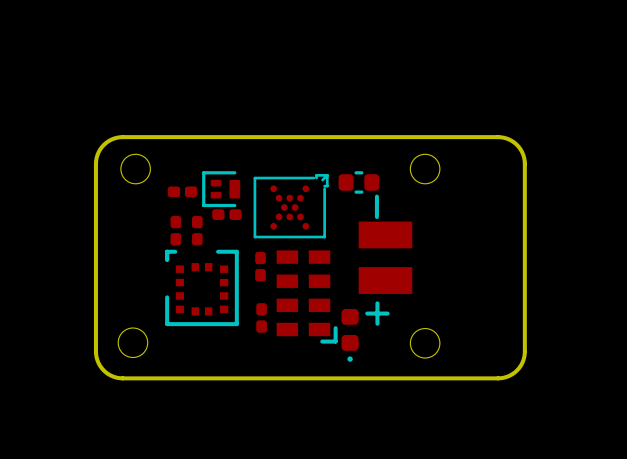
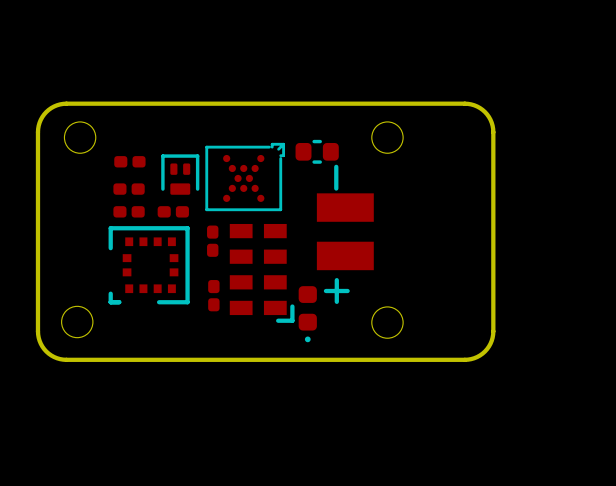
part rotation: 0° (221, 189) -> 90° clockwise (180, 174)
part: (226, 214) -> none
part: none -> (129, 189)
part: (175, 230) -> none
part: (197, 230) -> none
part: none -> (129, 211)
part: none -> (173, 211)
part rotation: 0° (201, 287) -> 90° counterclockwise (149, 265)

